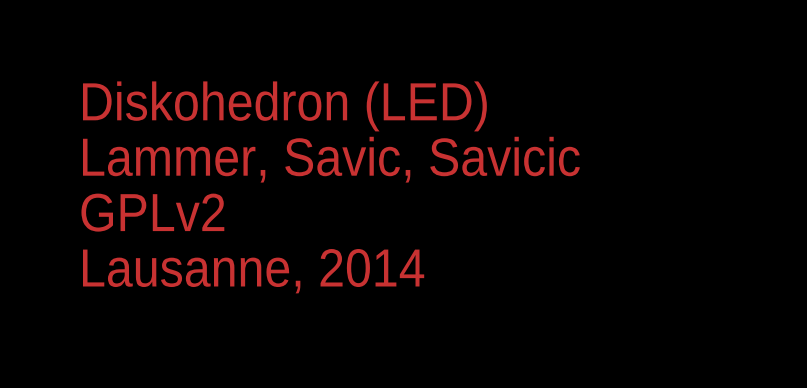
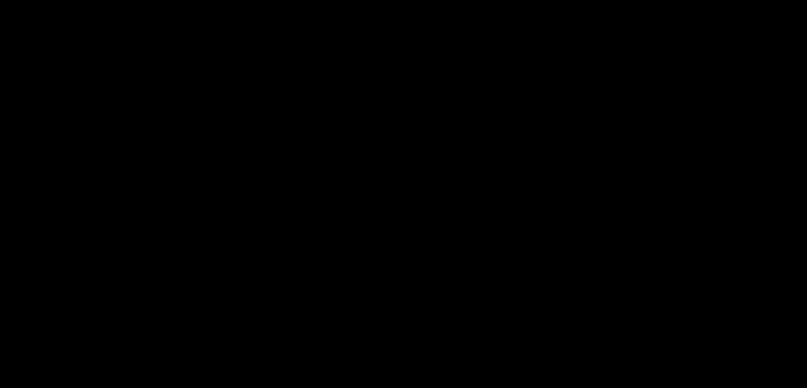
text: Diskohedron (LED) (284, 106) -> none
text: Lammer, Savic, Savicic (331, 159) -> none
text: GPLv2 (152, 212) -> none
text: Lausanne, 2014 (253, 271) -> none

